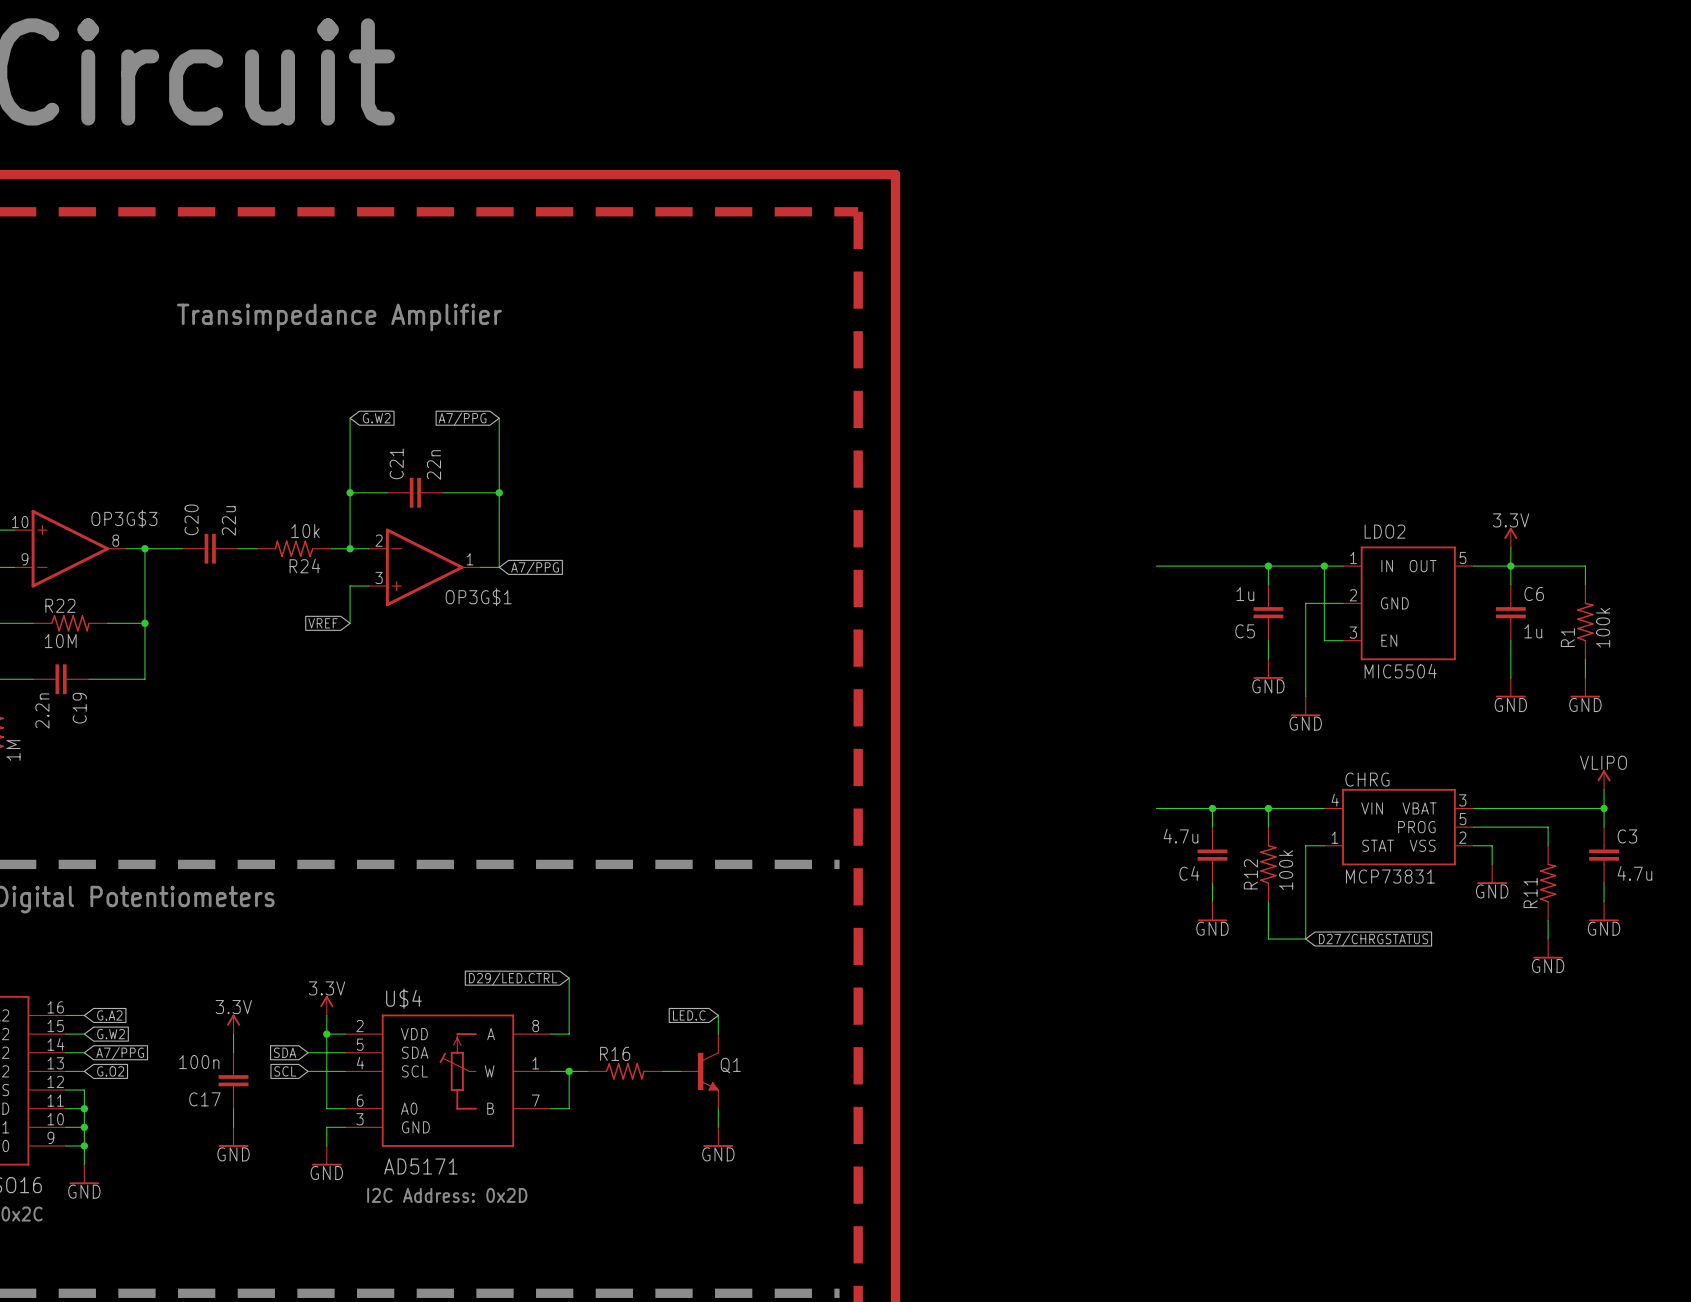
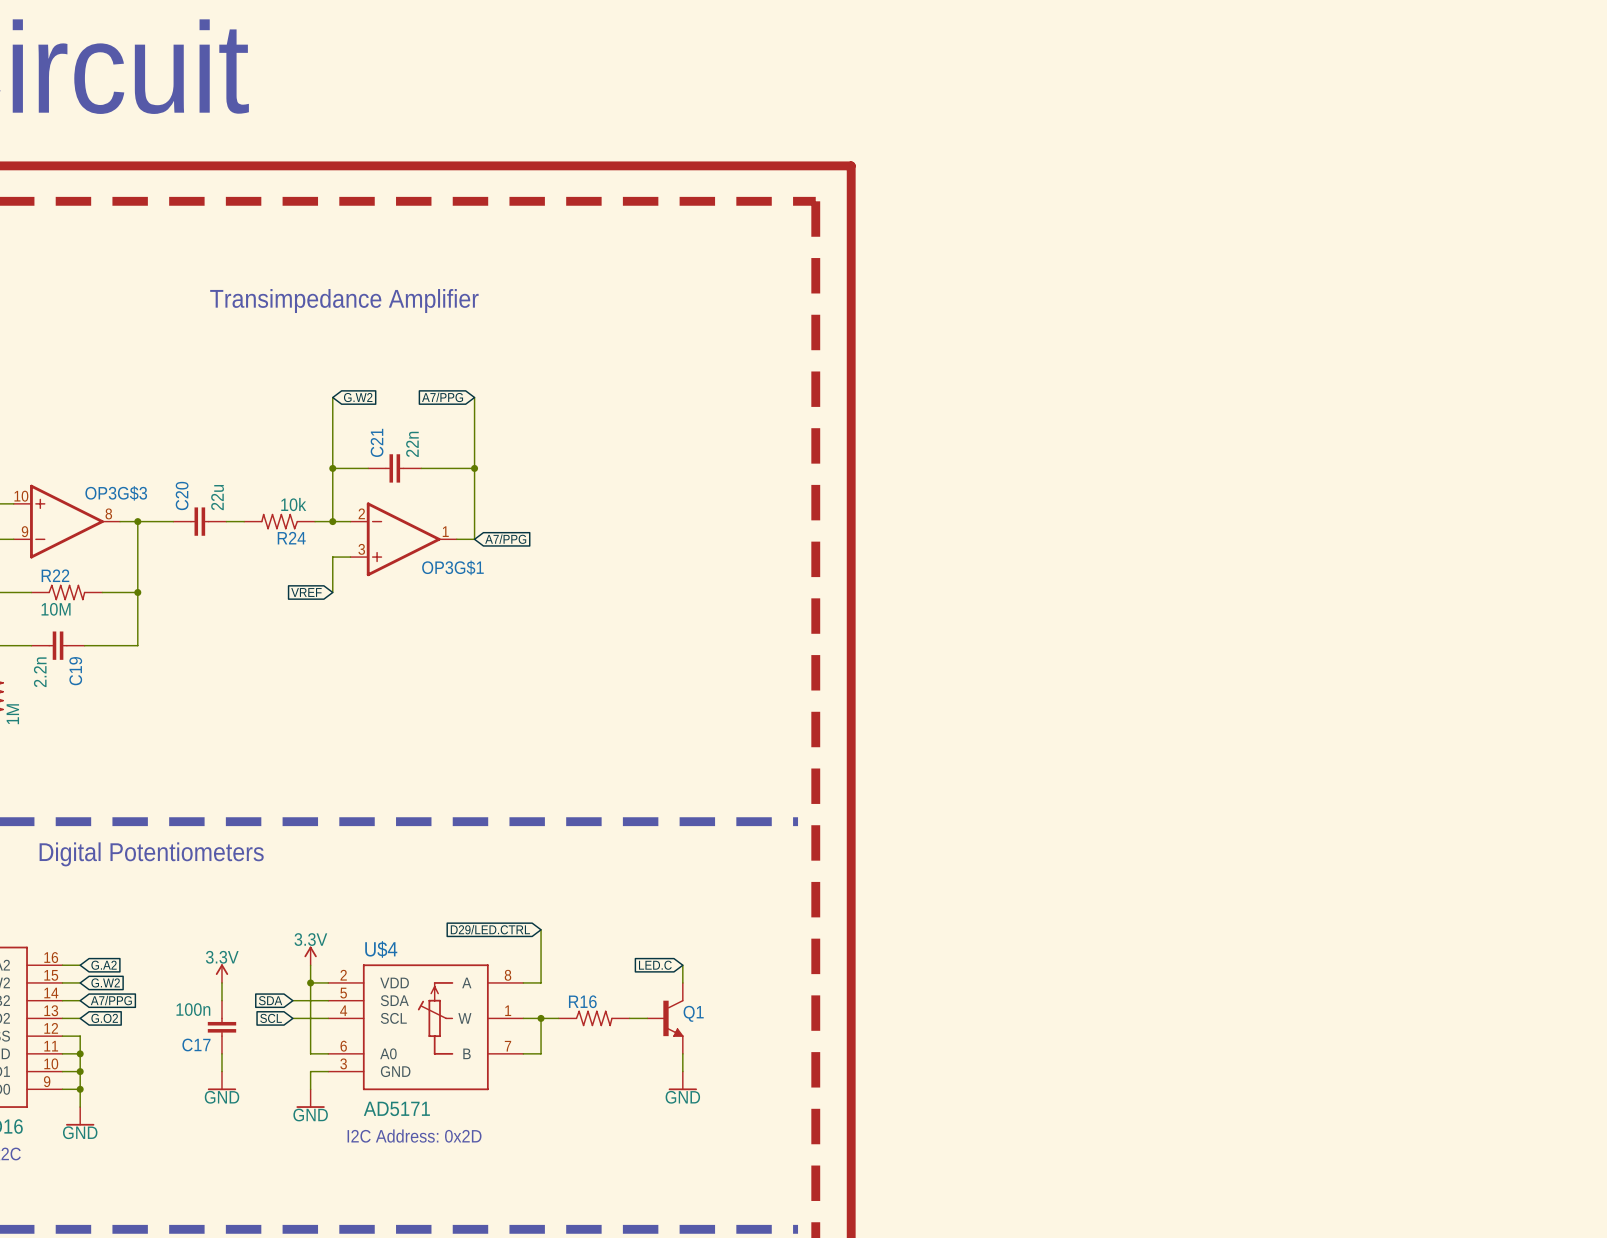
power symbol: 3.3V (1510, 537) -> none
wire: (1510, 547) (1510, 584) -> none
wire: (1156, 566) (1343, 566) -> none
wire: (1268, 566) (1268, 584) -> none
junction: (1268, 566) -> none
wire: (1324, 566) (1324, 640) (1343, 640) -> none
junction: (1324, 566) -> none
wire: (1473, 566) (1585, 566) (1585, 584) -> none
junction: (1510, 566) -> none
wire: (1343, 603) (1305, 603) (1305, 696) -> none
LDO2: MIC5504 (1408, 603) -> none
C5: 1u (1268, 612) -> none
C6: 1u (1510, 612) -> none
R1: 100k (1585, 622) -> none
wire: (1268, 640) (1268, 659) -> none
wire: (1510, 640) (1510, 677) -> none
wire: (1585, 659) (1585, 677) -> none
power symbol: GND (1268, 669) -> none
power symbol: GND (1510, 687) -> none
power symbol: GND (1585, 687) -> none
power symbol: GND (1305, 706) -> none
power symbol: VLIPO (1604, 780) -> none
wire: (1604, 789) (1604, 827) -> none
wire: (1156, 808) (1324, 808) -> none
wire: (1212, 808) (1212, 827) -> none
junction: (1212, 808) -> none
wire: (1268, 808) (1268, 827) -> none
junction: (1268, 808) -> none
wire: (1473, 808) (1604, 808) -> none
junction: (1604, 808) -> none
CHRG: MCP73831 (1398, 827) -> none
wire: (1473, 827) (1548, 827) (1548, 845) -> none
wire: (1324, 845) (1305, 845) (1305, 939) (1268, 939) (1268, 901) -> none
wire: (1473, 845) (1492, 845) (1492, 864) -> none
C4: 4.7u (1212, 855) -> none
C3: 4.7u (1604, 855) -> none
R12: 100k (1268, 864) -> none
power symbol: GND (1492, 874) -> none
wire: (1212, 883) (1212, 901) -> none
R11: (1548, 883) -> none
wire: (1604, 883) (1604, 901) -> none
power symbol: GND (1212, 911) -> none
power symbol: GND (1604, 911) -> none
wire: (1548, 920) (1548, 939) -> none
global label: D27/CHRGSTATUS (1373, 939) -> none
power symbol: GND (1548, 948) -> none

